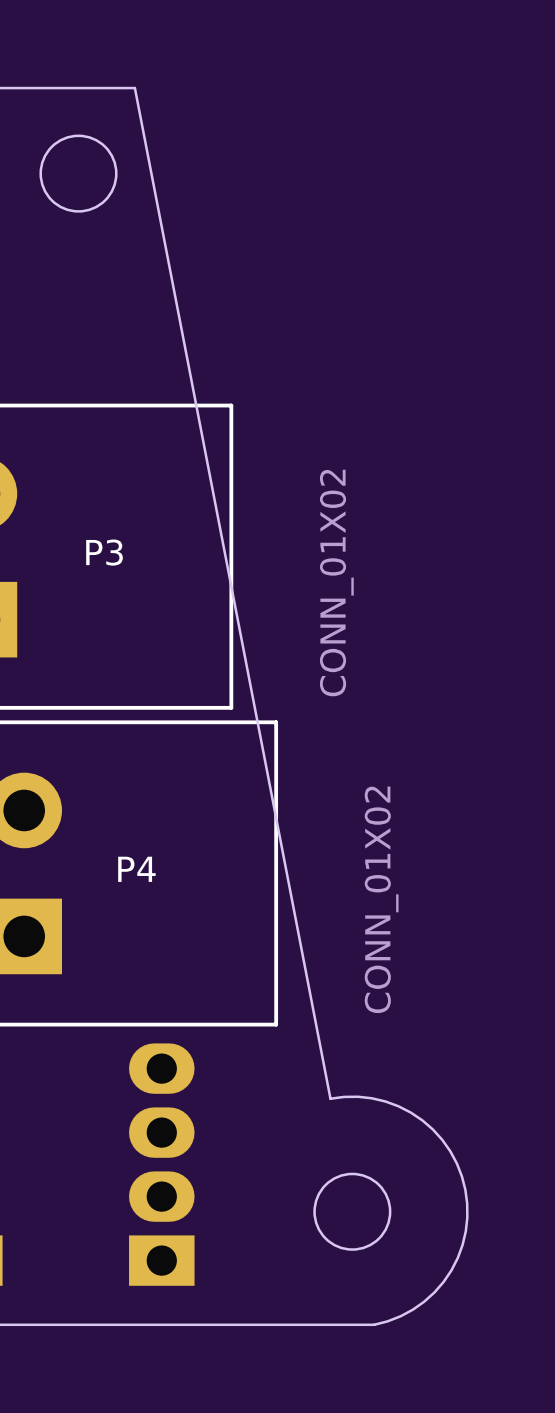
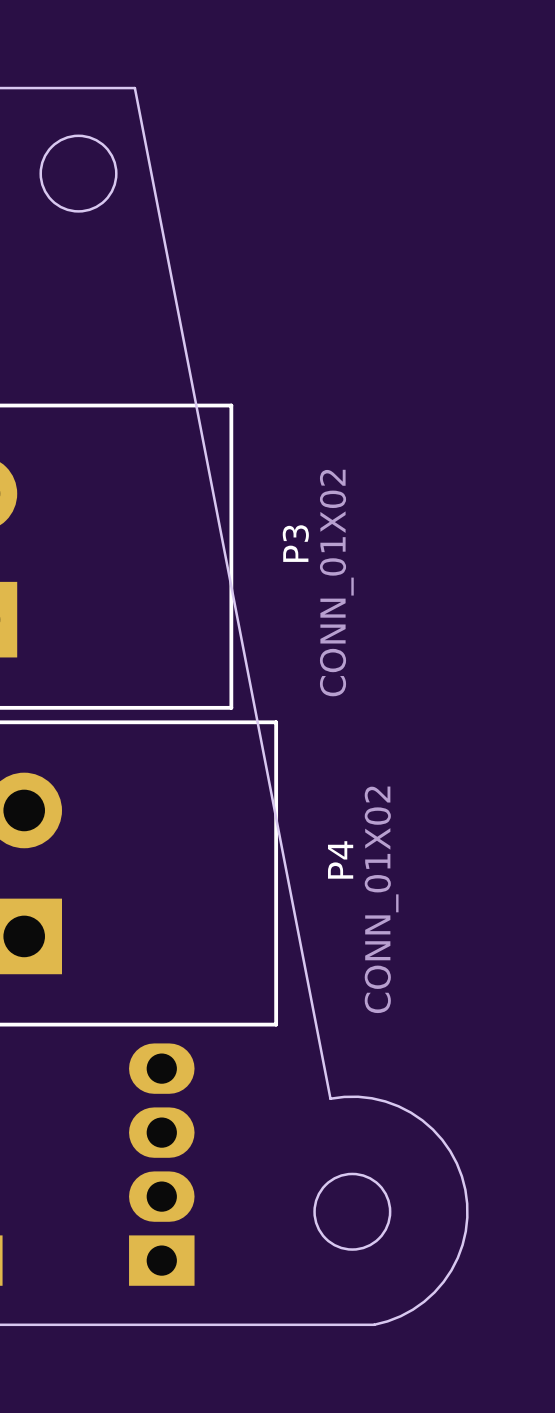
P3 name rotation: 0° (104, 552) -> 90° counterclockwise (295, 543)
P3 name position: P3 (104, 552) -> P3 (295, 543)
P4 name rotation: 0° (136, 869) -> 90° counterclockwise (340, 859)
P4 name position: P4 (136, 869) -> P4 (340, 859)

